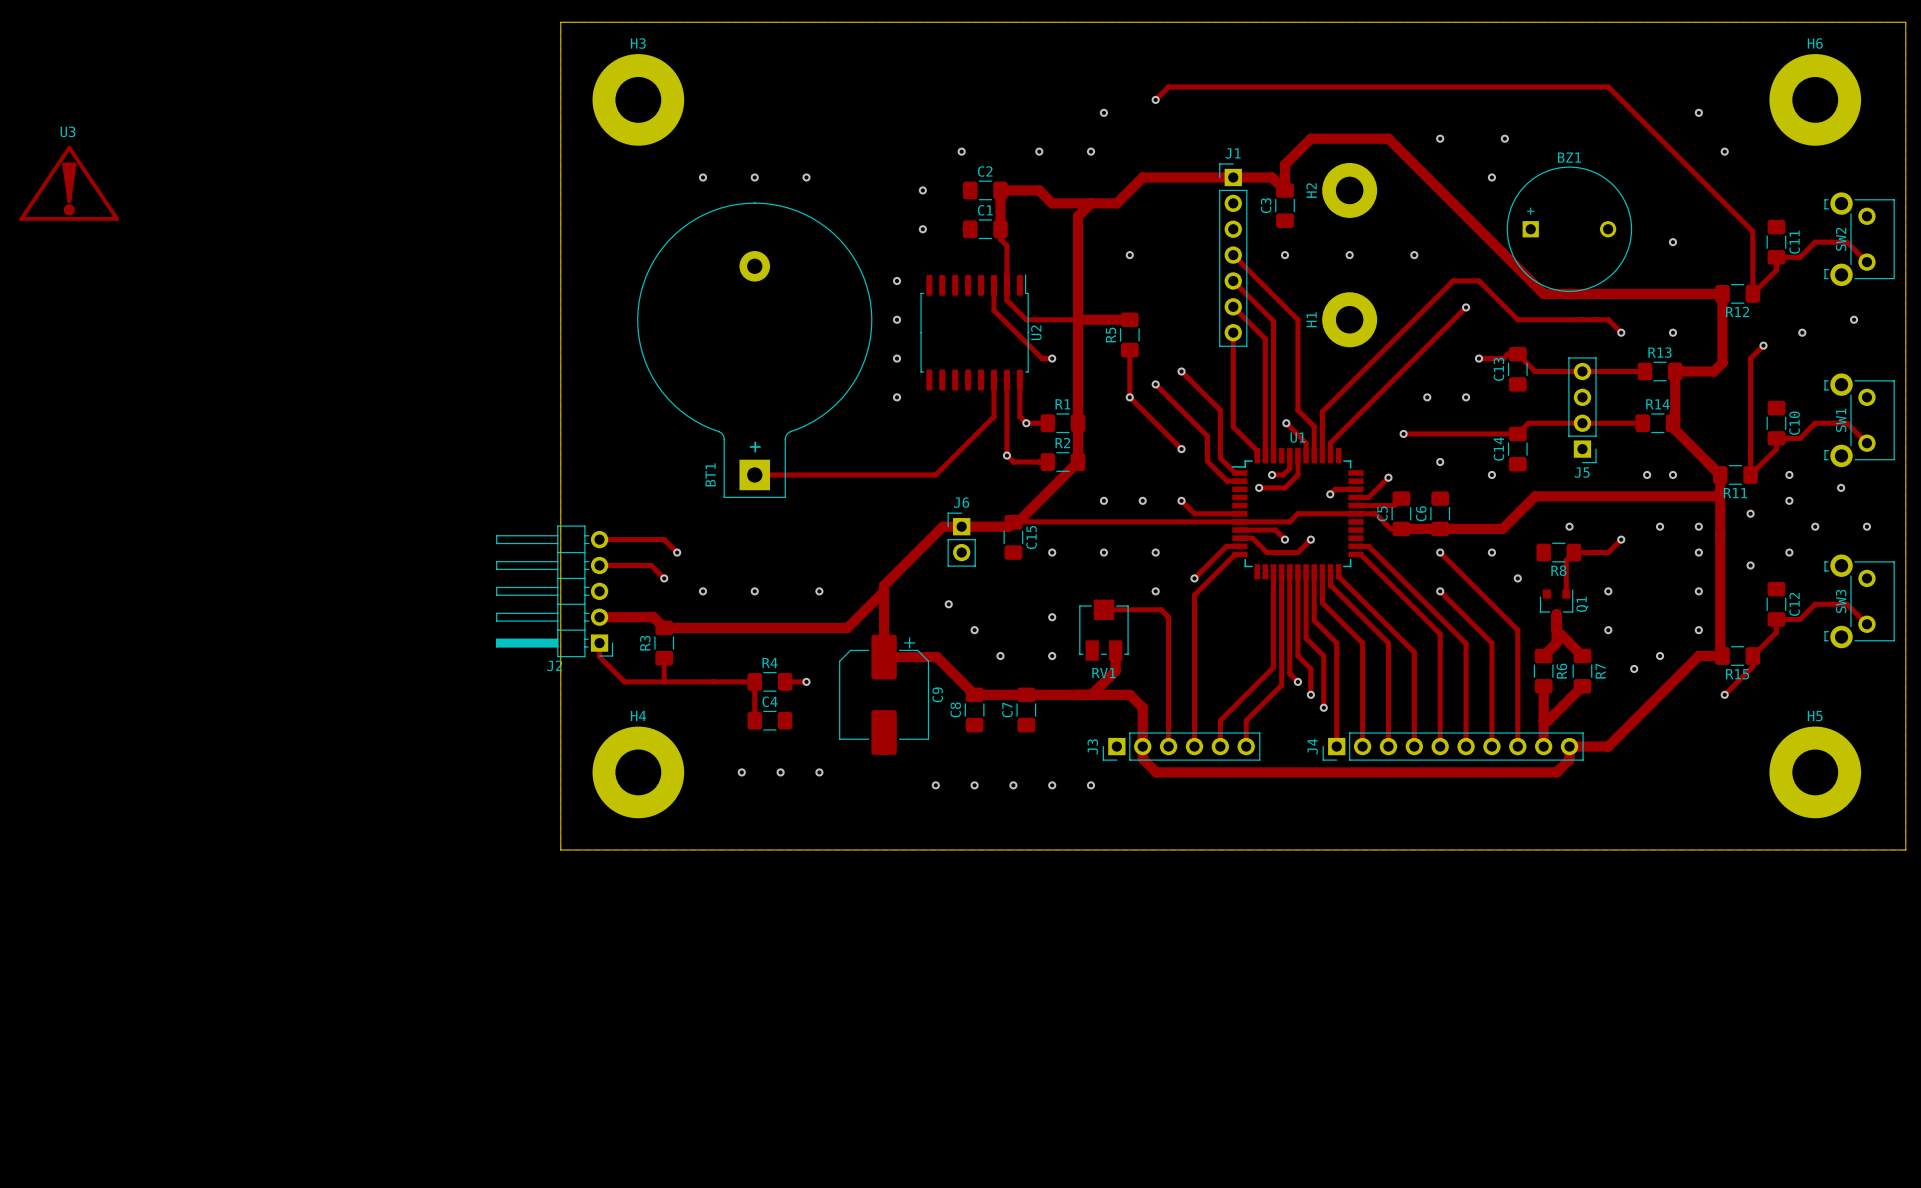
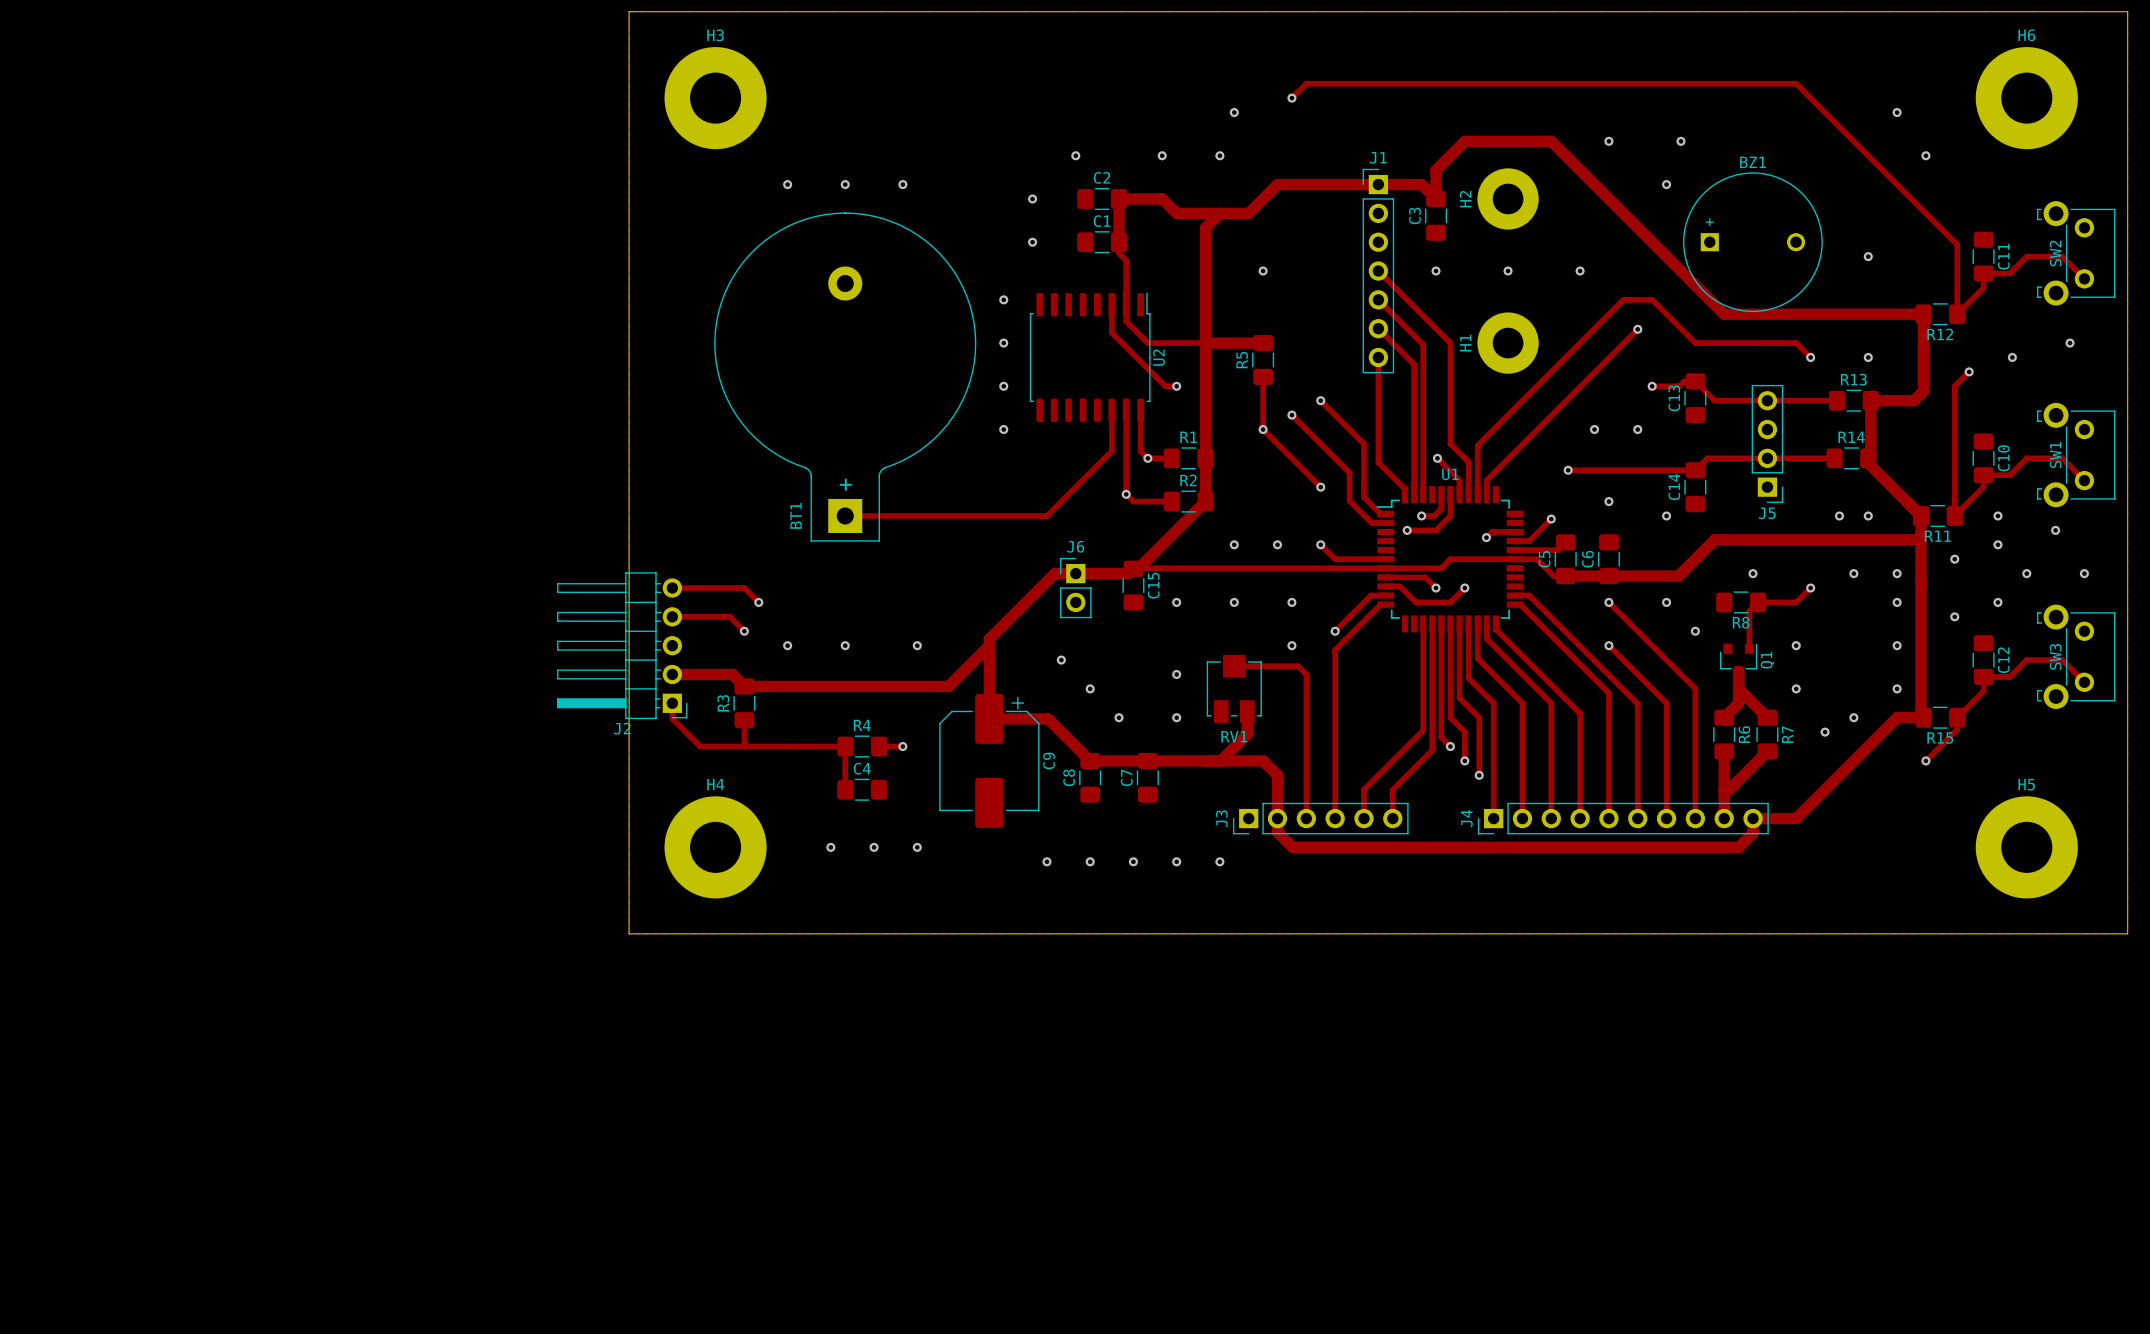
U3: (69, 183) -> none

